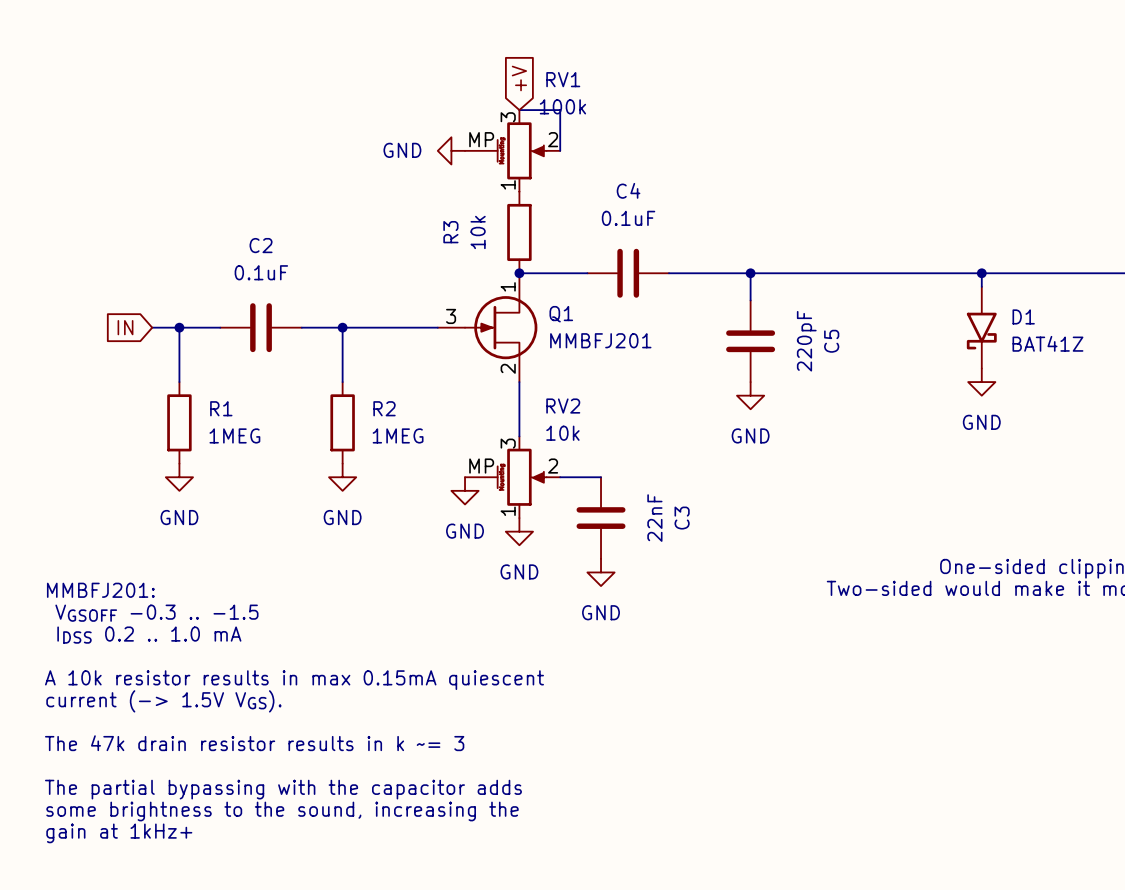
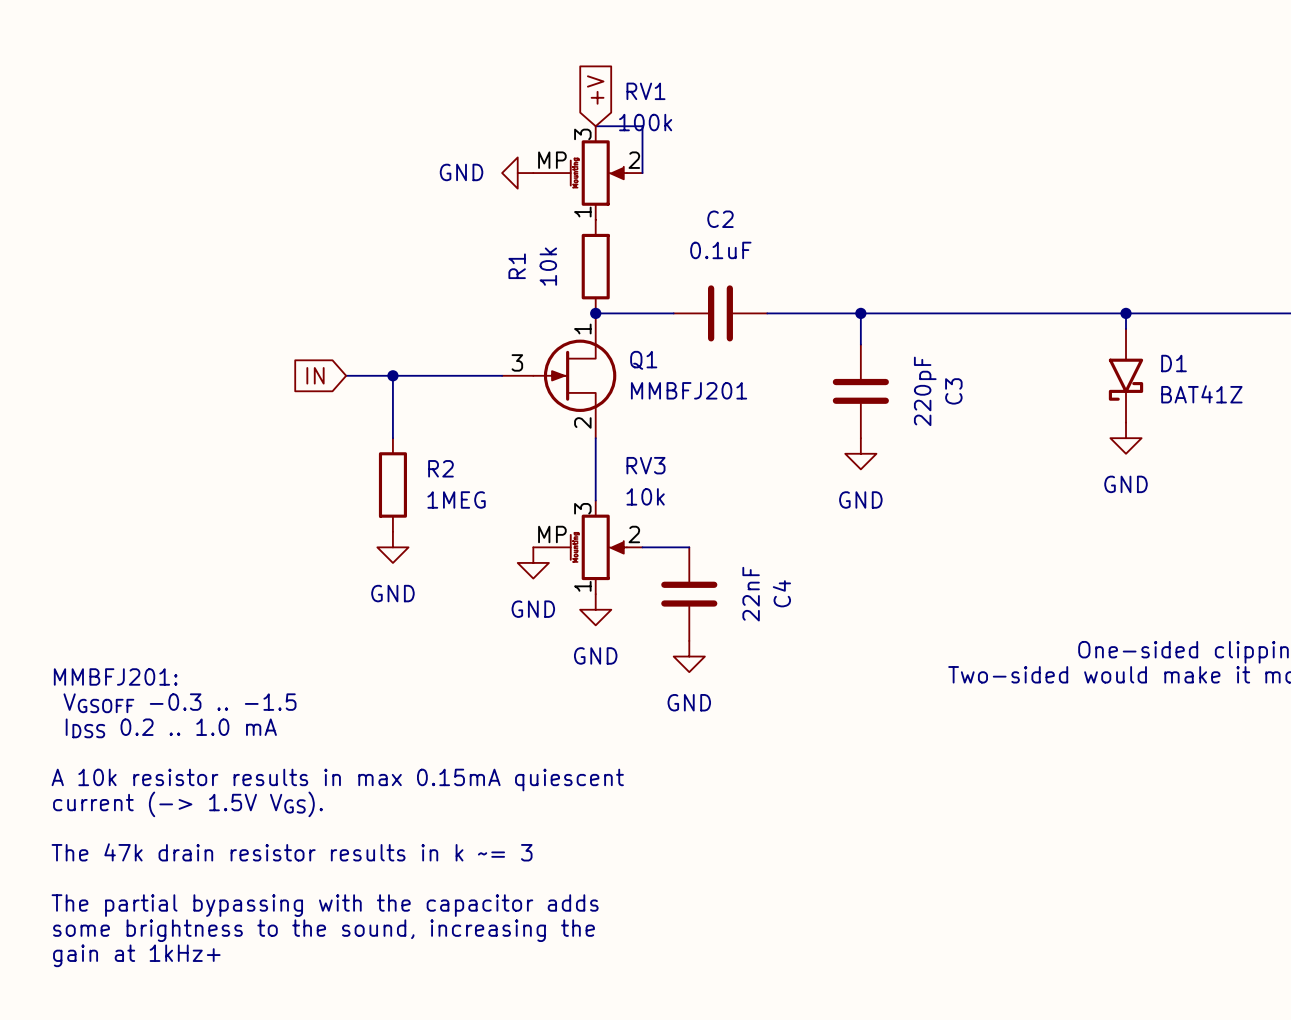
C4 name: C4 (628, 190) -> C2 (720, 219)
R3 name: R3 (450, 232) -> R1 (517, 266)
global label position: IN (125, 327) -> IN (315, 375)
wire: (152, 327) (220, 327) -> none
wire: (179, 327) (179, 382) -> none
junction: (179, 327) -> none
C2: 0.1uF (261, 327) -> none
C5 name: C5 (831, 341) -> C3 (953, 391)
RV2 name: RV2 (563, 406) -> RV3 (645, 465)
R1: 1MEG (179, 422) -> none
power symbol: GND (179, 477) -> none
C3 name: C3 (682, 518) -> C4 (781, 593)

